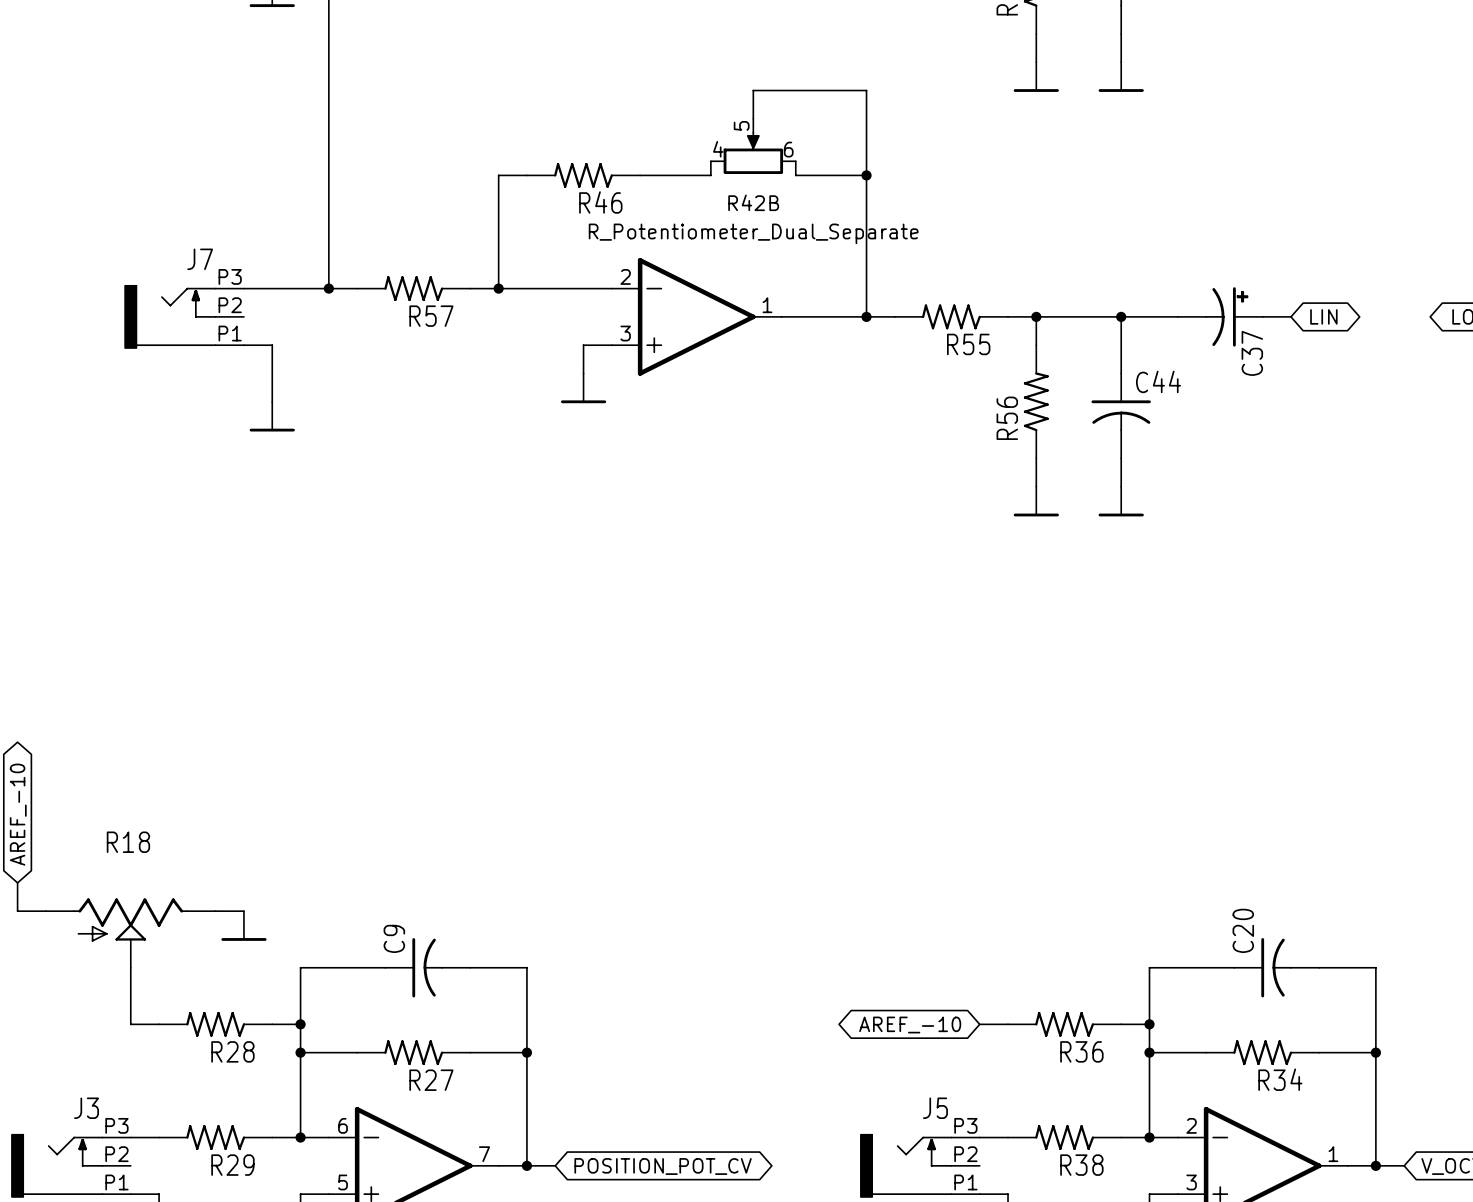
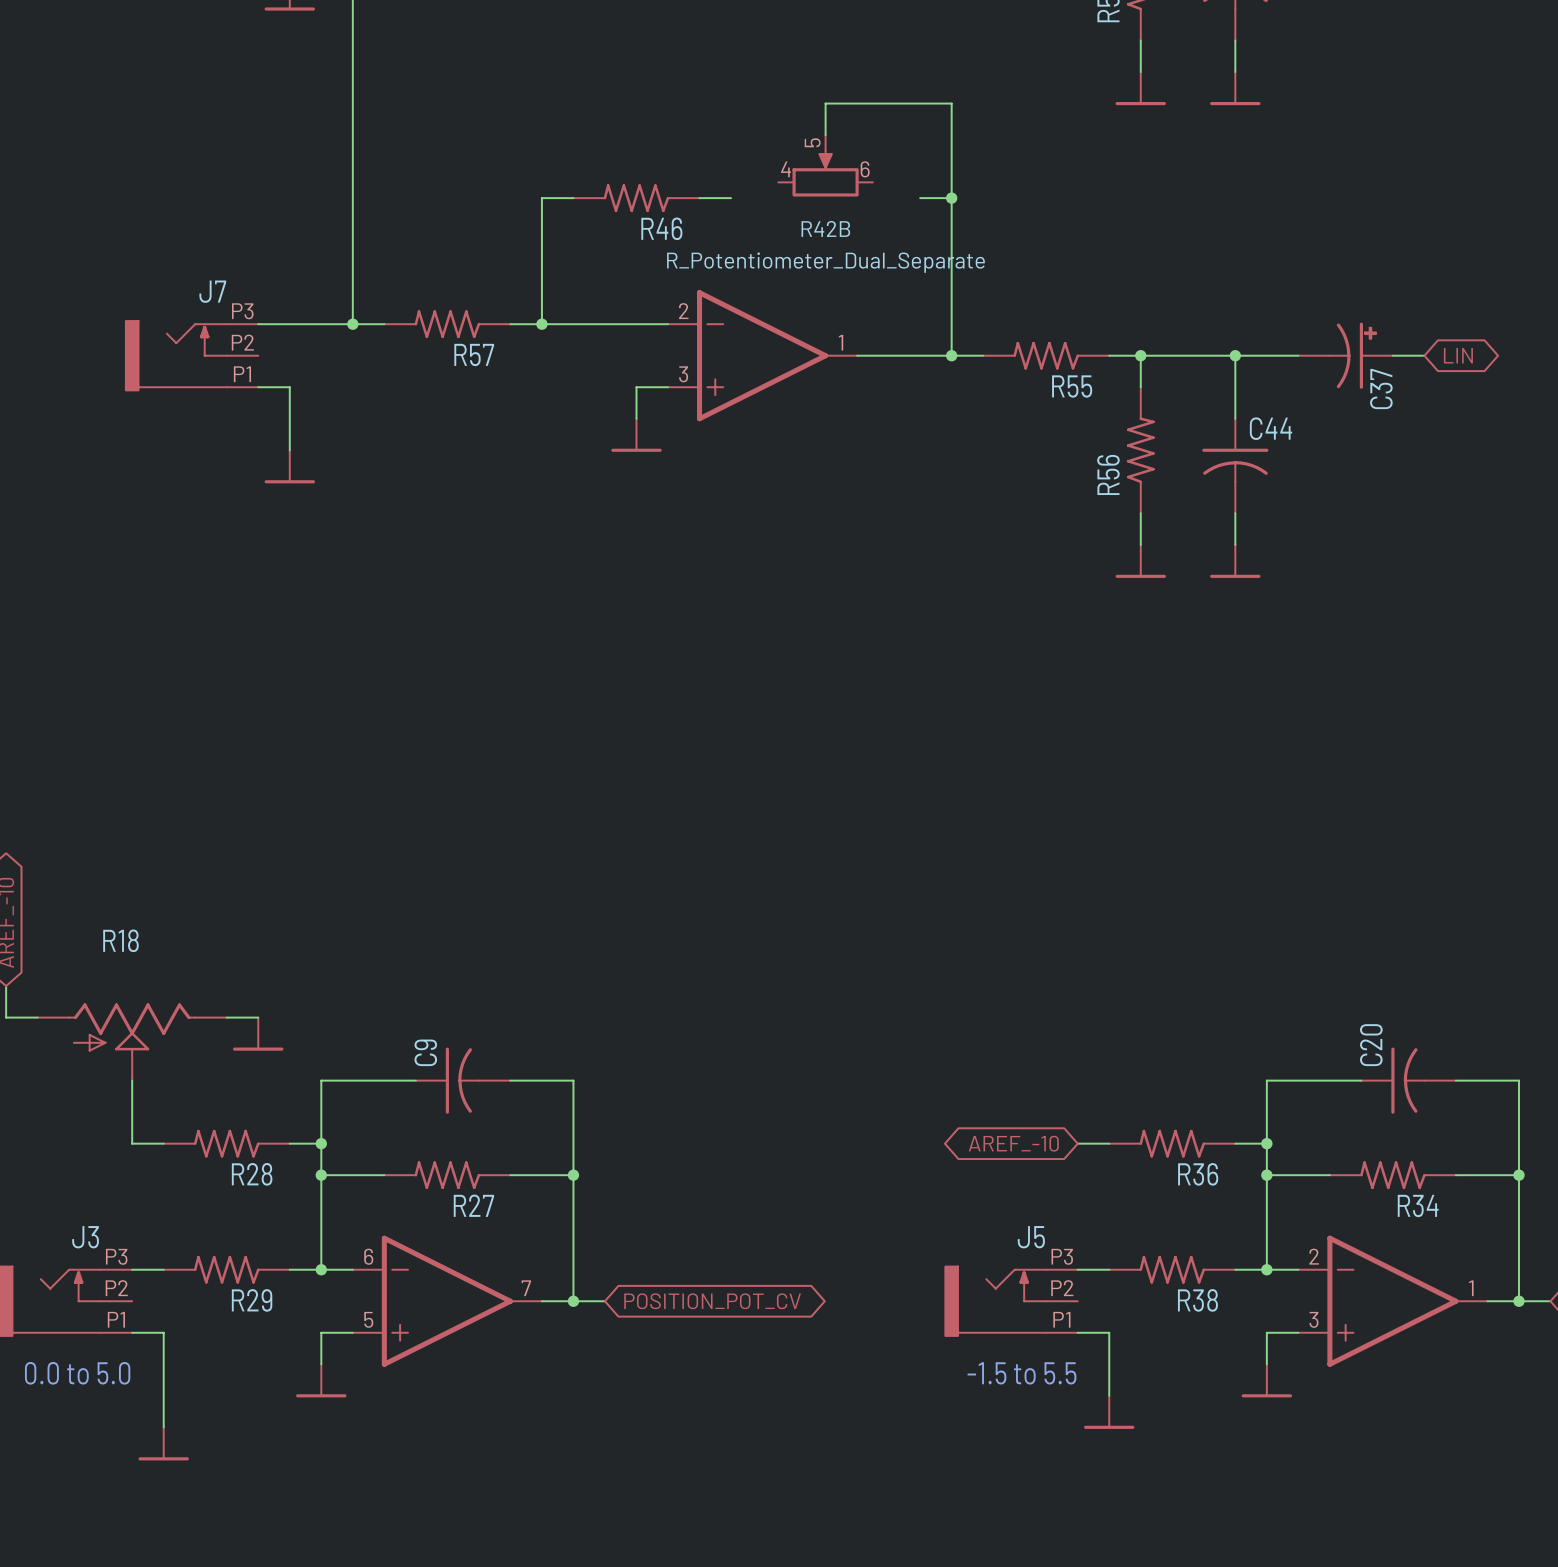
wire: (710, 161) (710, 175) (668, 175) -> none
wire: (795, 161) (795, 175) (838, 175) -> none

